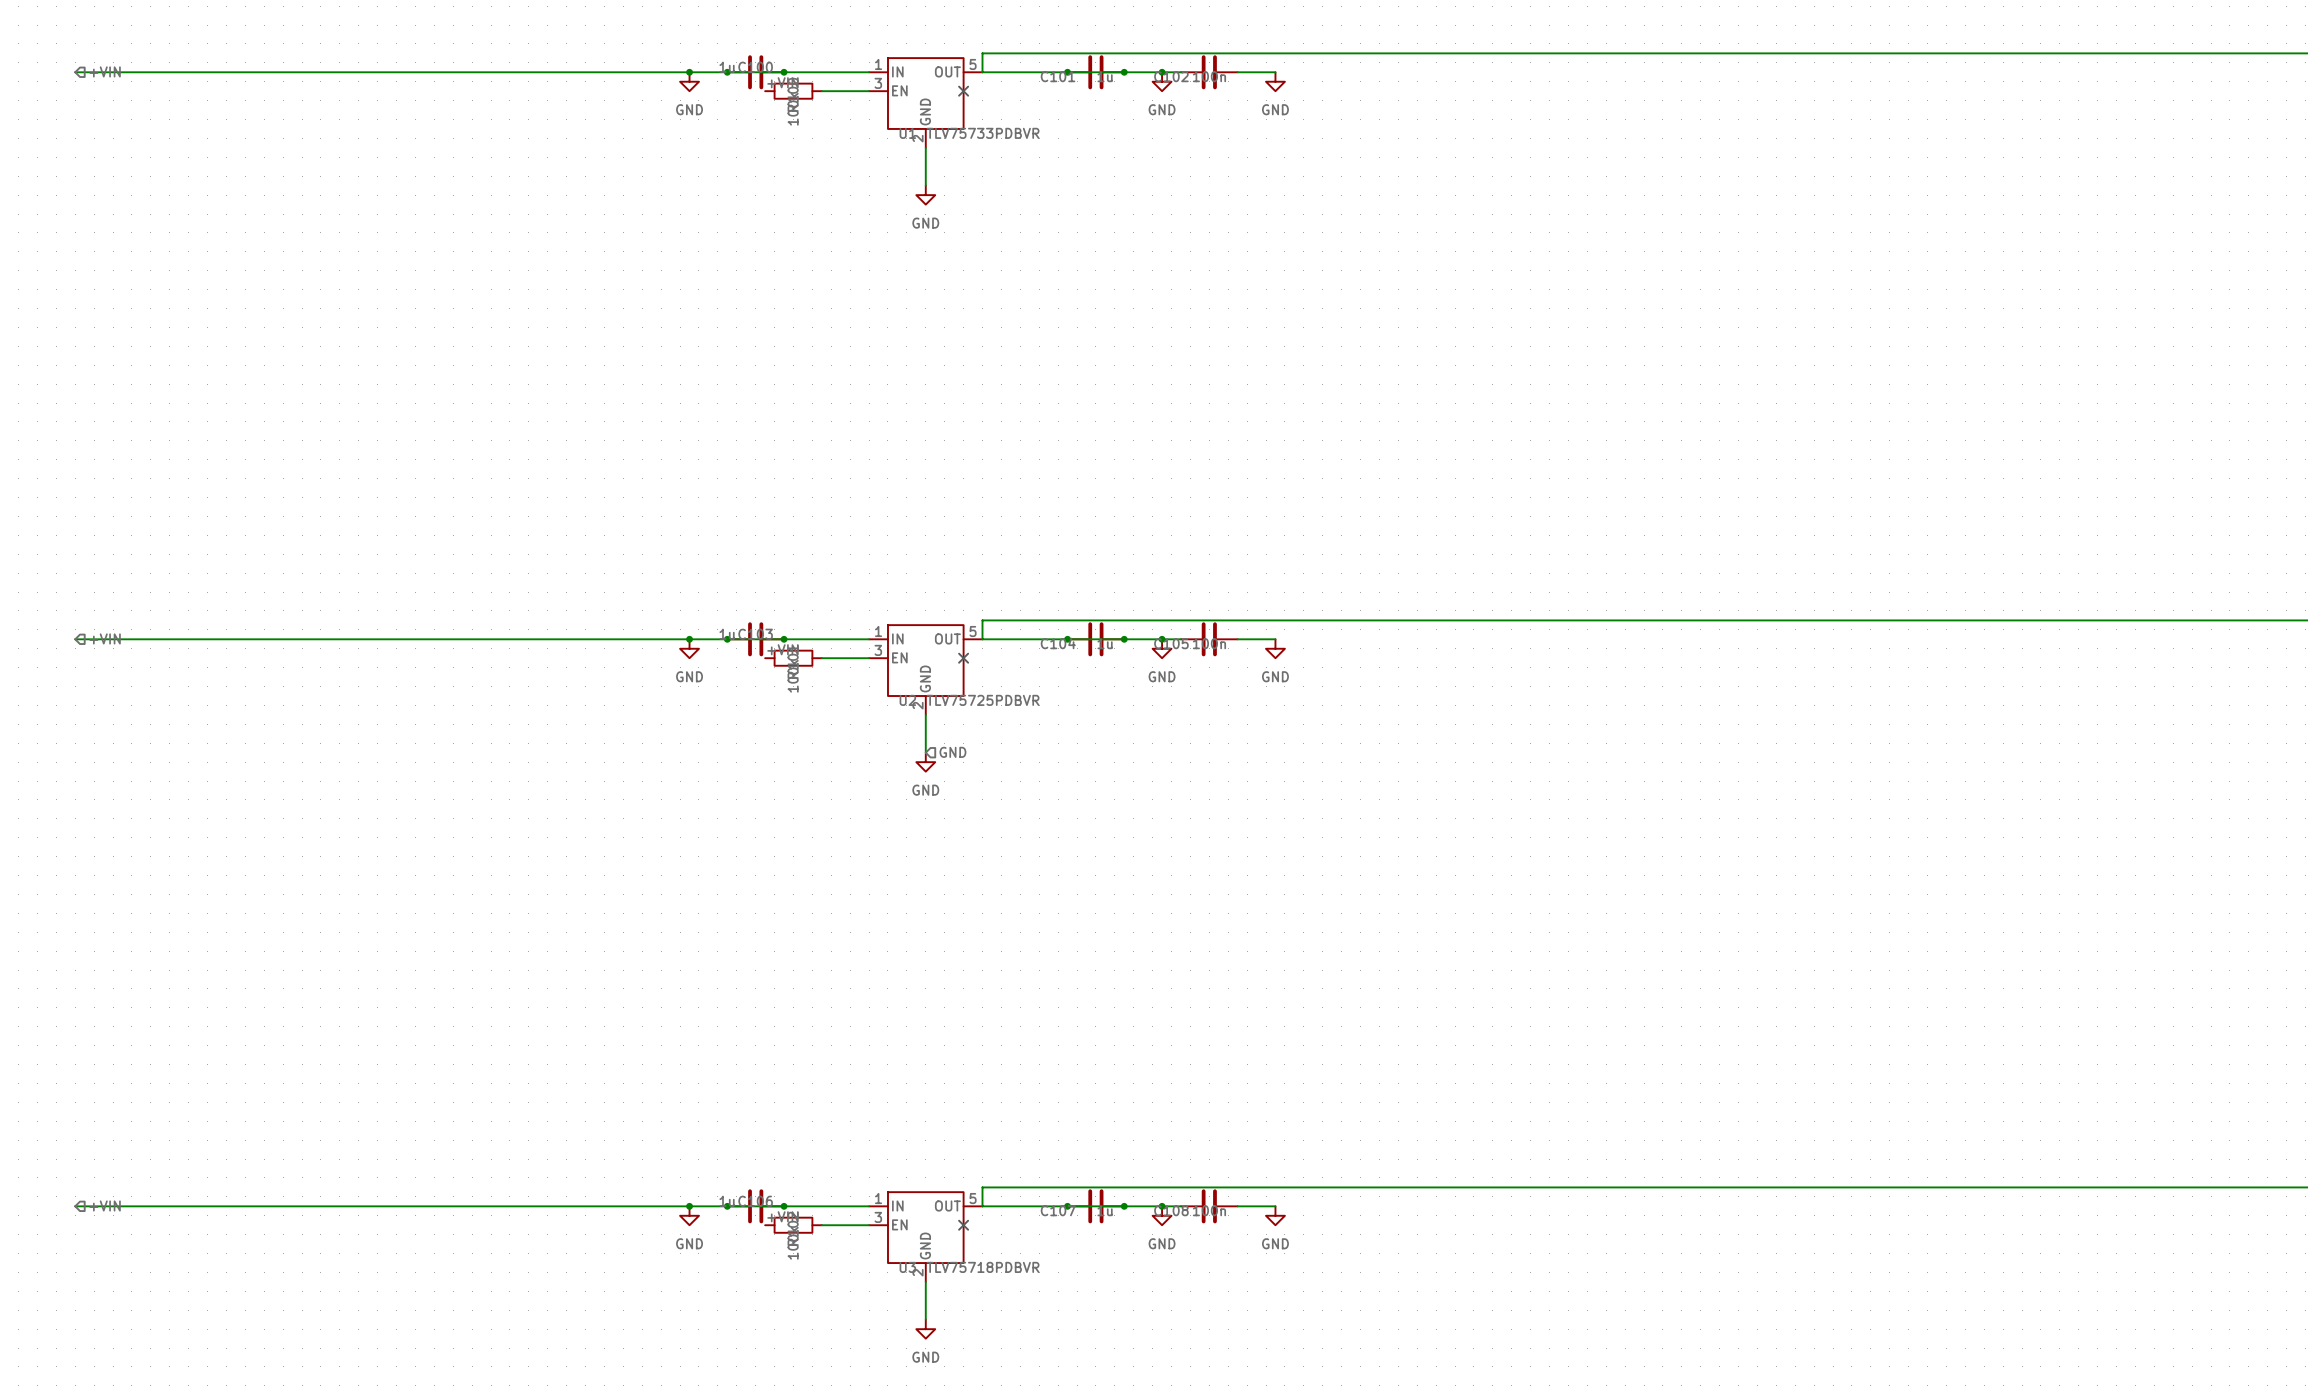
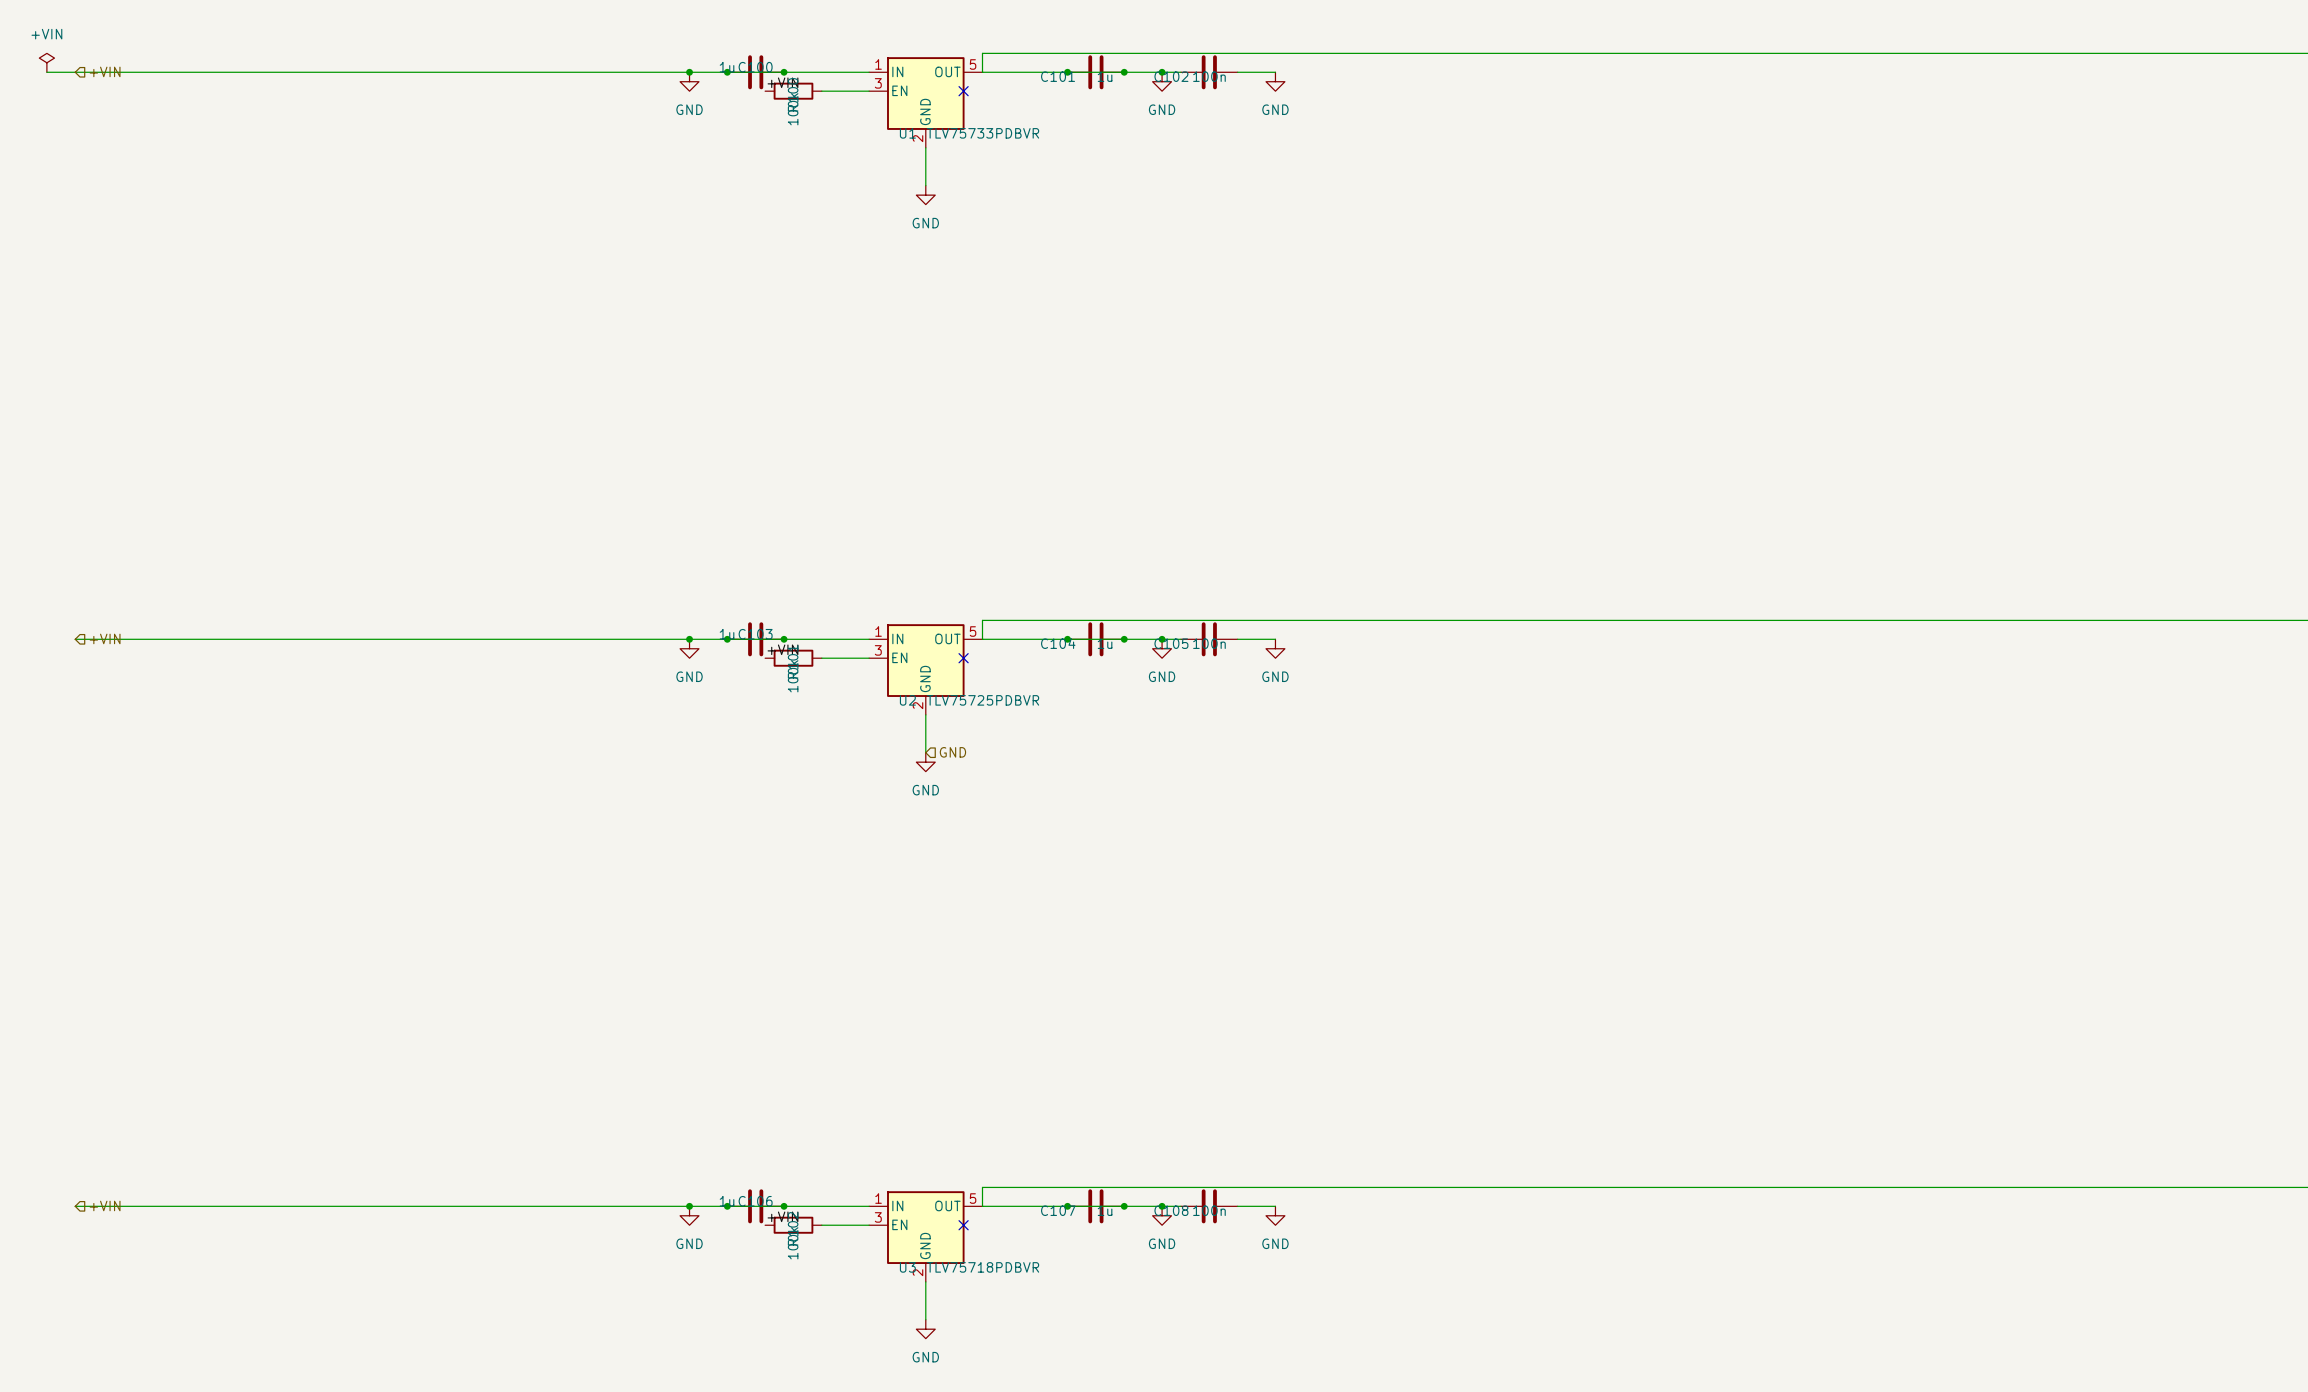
power symbol: none -> +VIN (46, 62)
wire: none -> (46, 72) (75, 72)

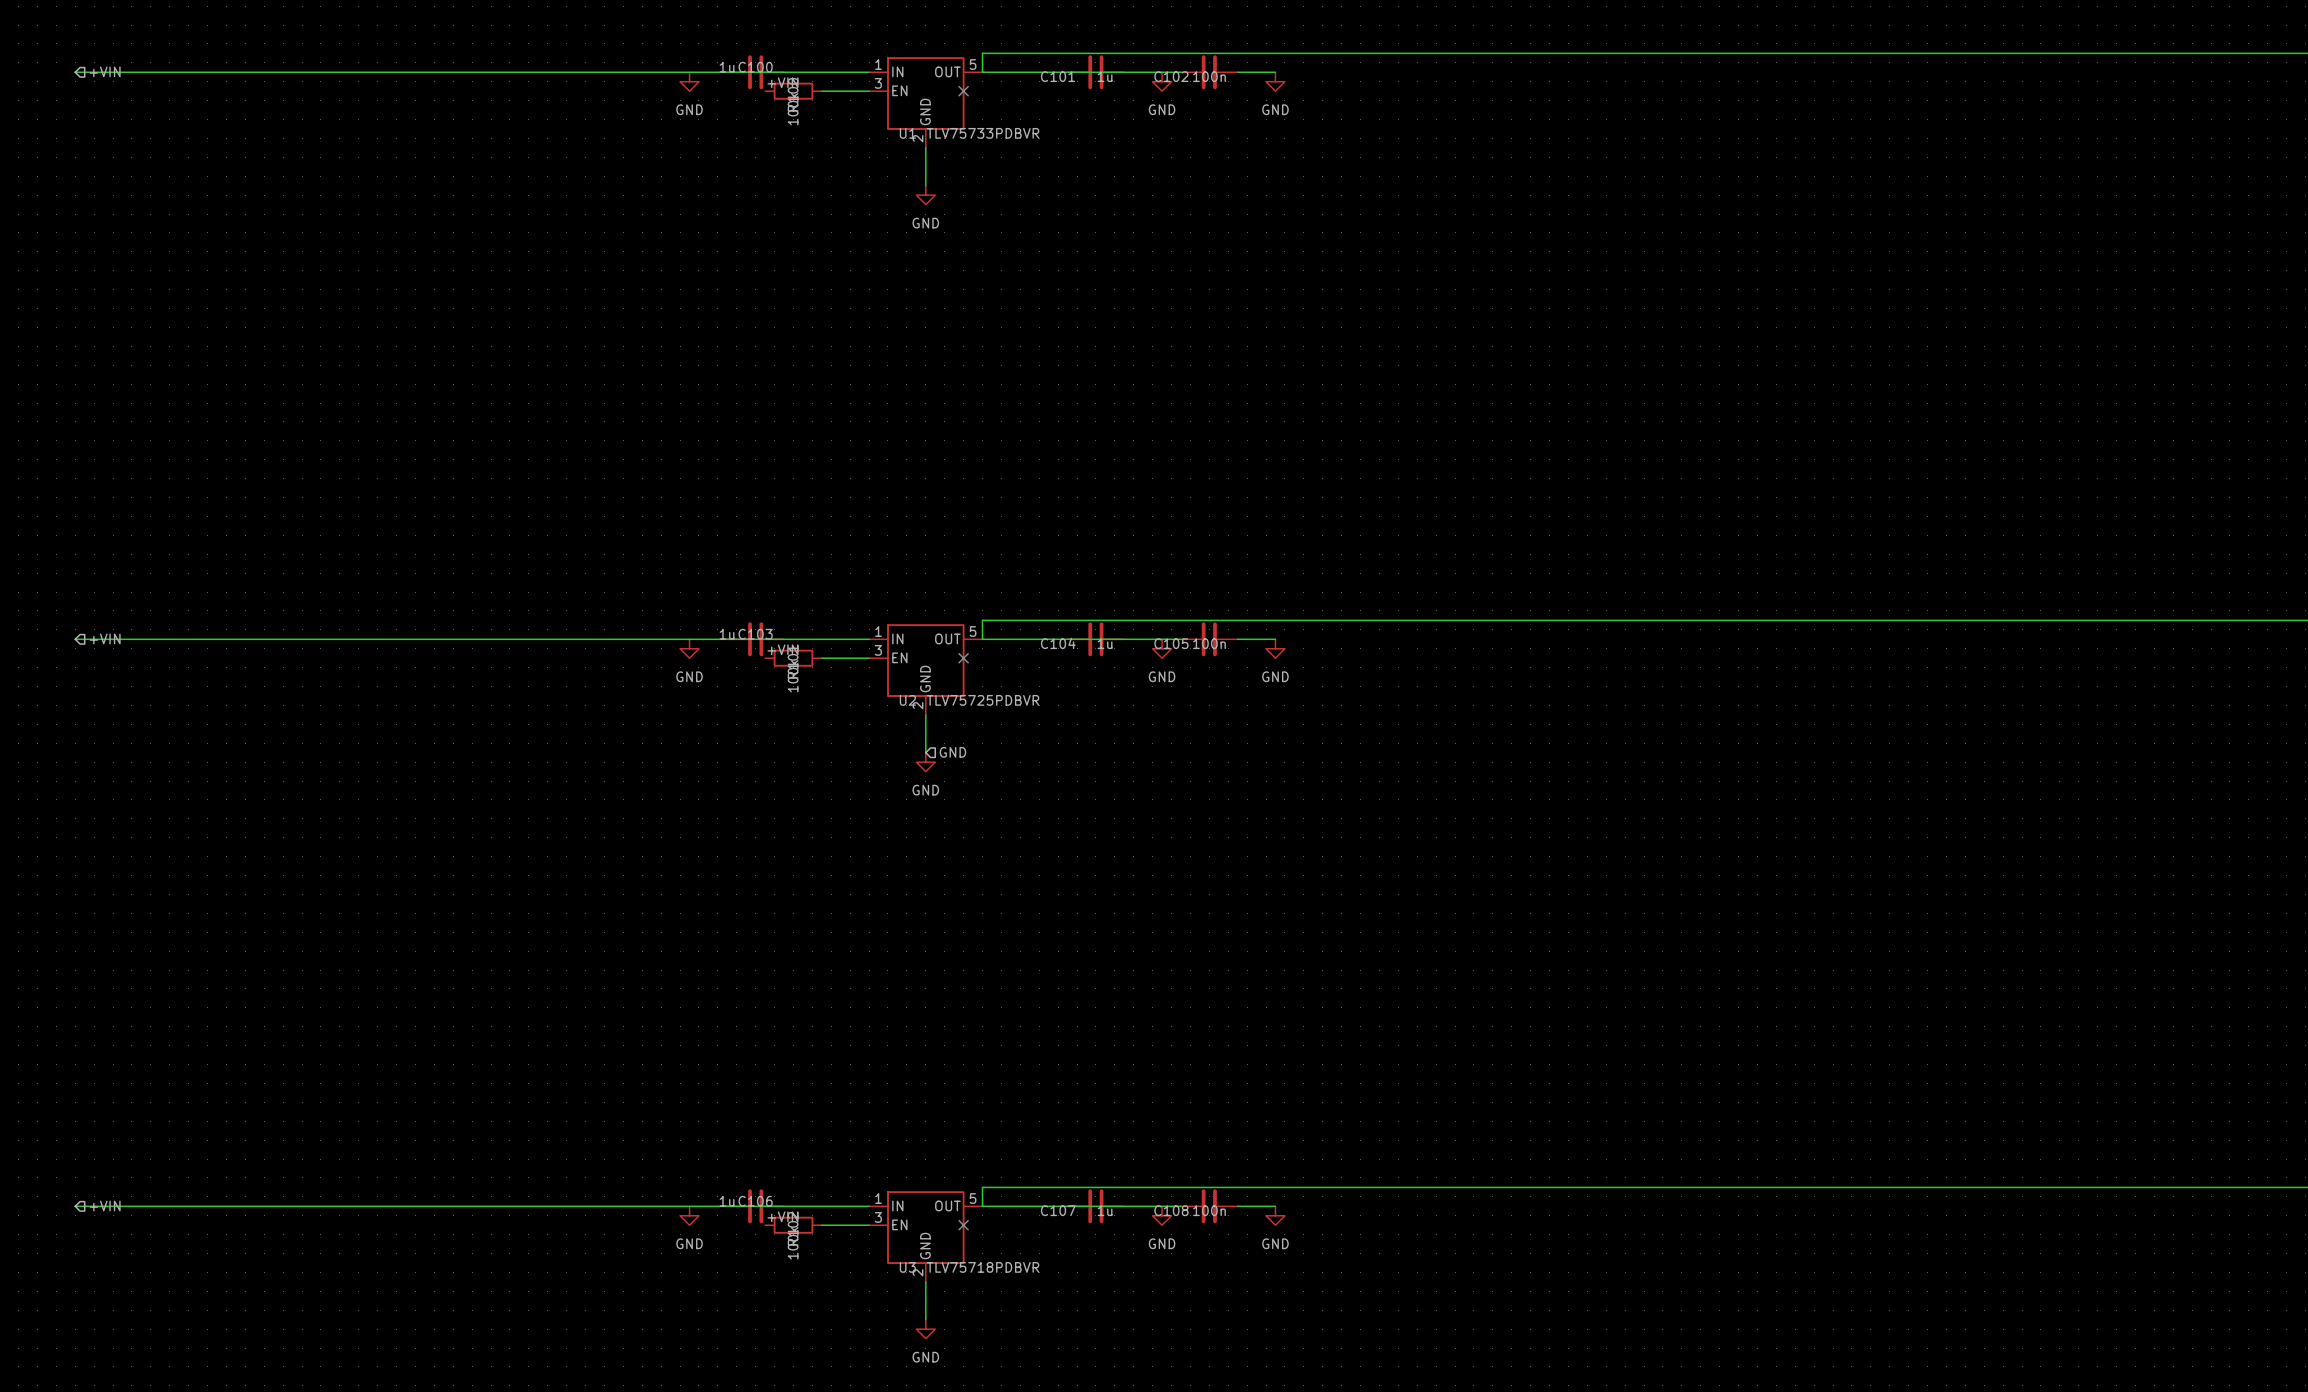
power symbol: +VIN (46, 62) -> none
wire: (46, 72) (75, 72) -> none
junction: (689, 72) -> none
junction: (727, 72) -> none
junction: (784, 72) -> none
junction: (1067, 72) -> none
junction: (1124, 72) -> none
junction: (1162, 72) -> none
junction: (689, 639) -> none
junction: (727, 639) -> none
junction: (784, 639) -> none
junction: (1067, 639) -> none
junction: (1124, 639) -> none
junction: (1162, 639) -> none
junction: (689, 1206) -> none
junction: (727, 1206) -> none
junction: (784, 1206) -> none
junction: (1067, 1206) -> none
junction: (1124, 1206) -> none
junction: (1162, 1206) -> none

